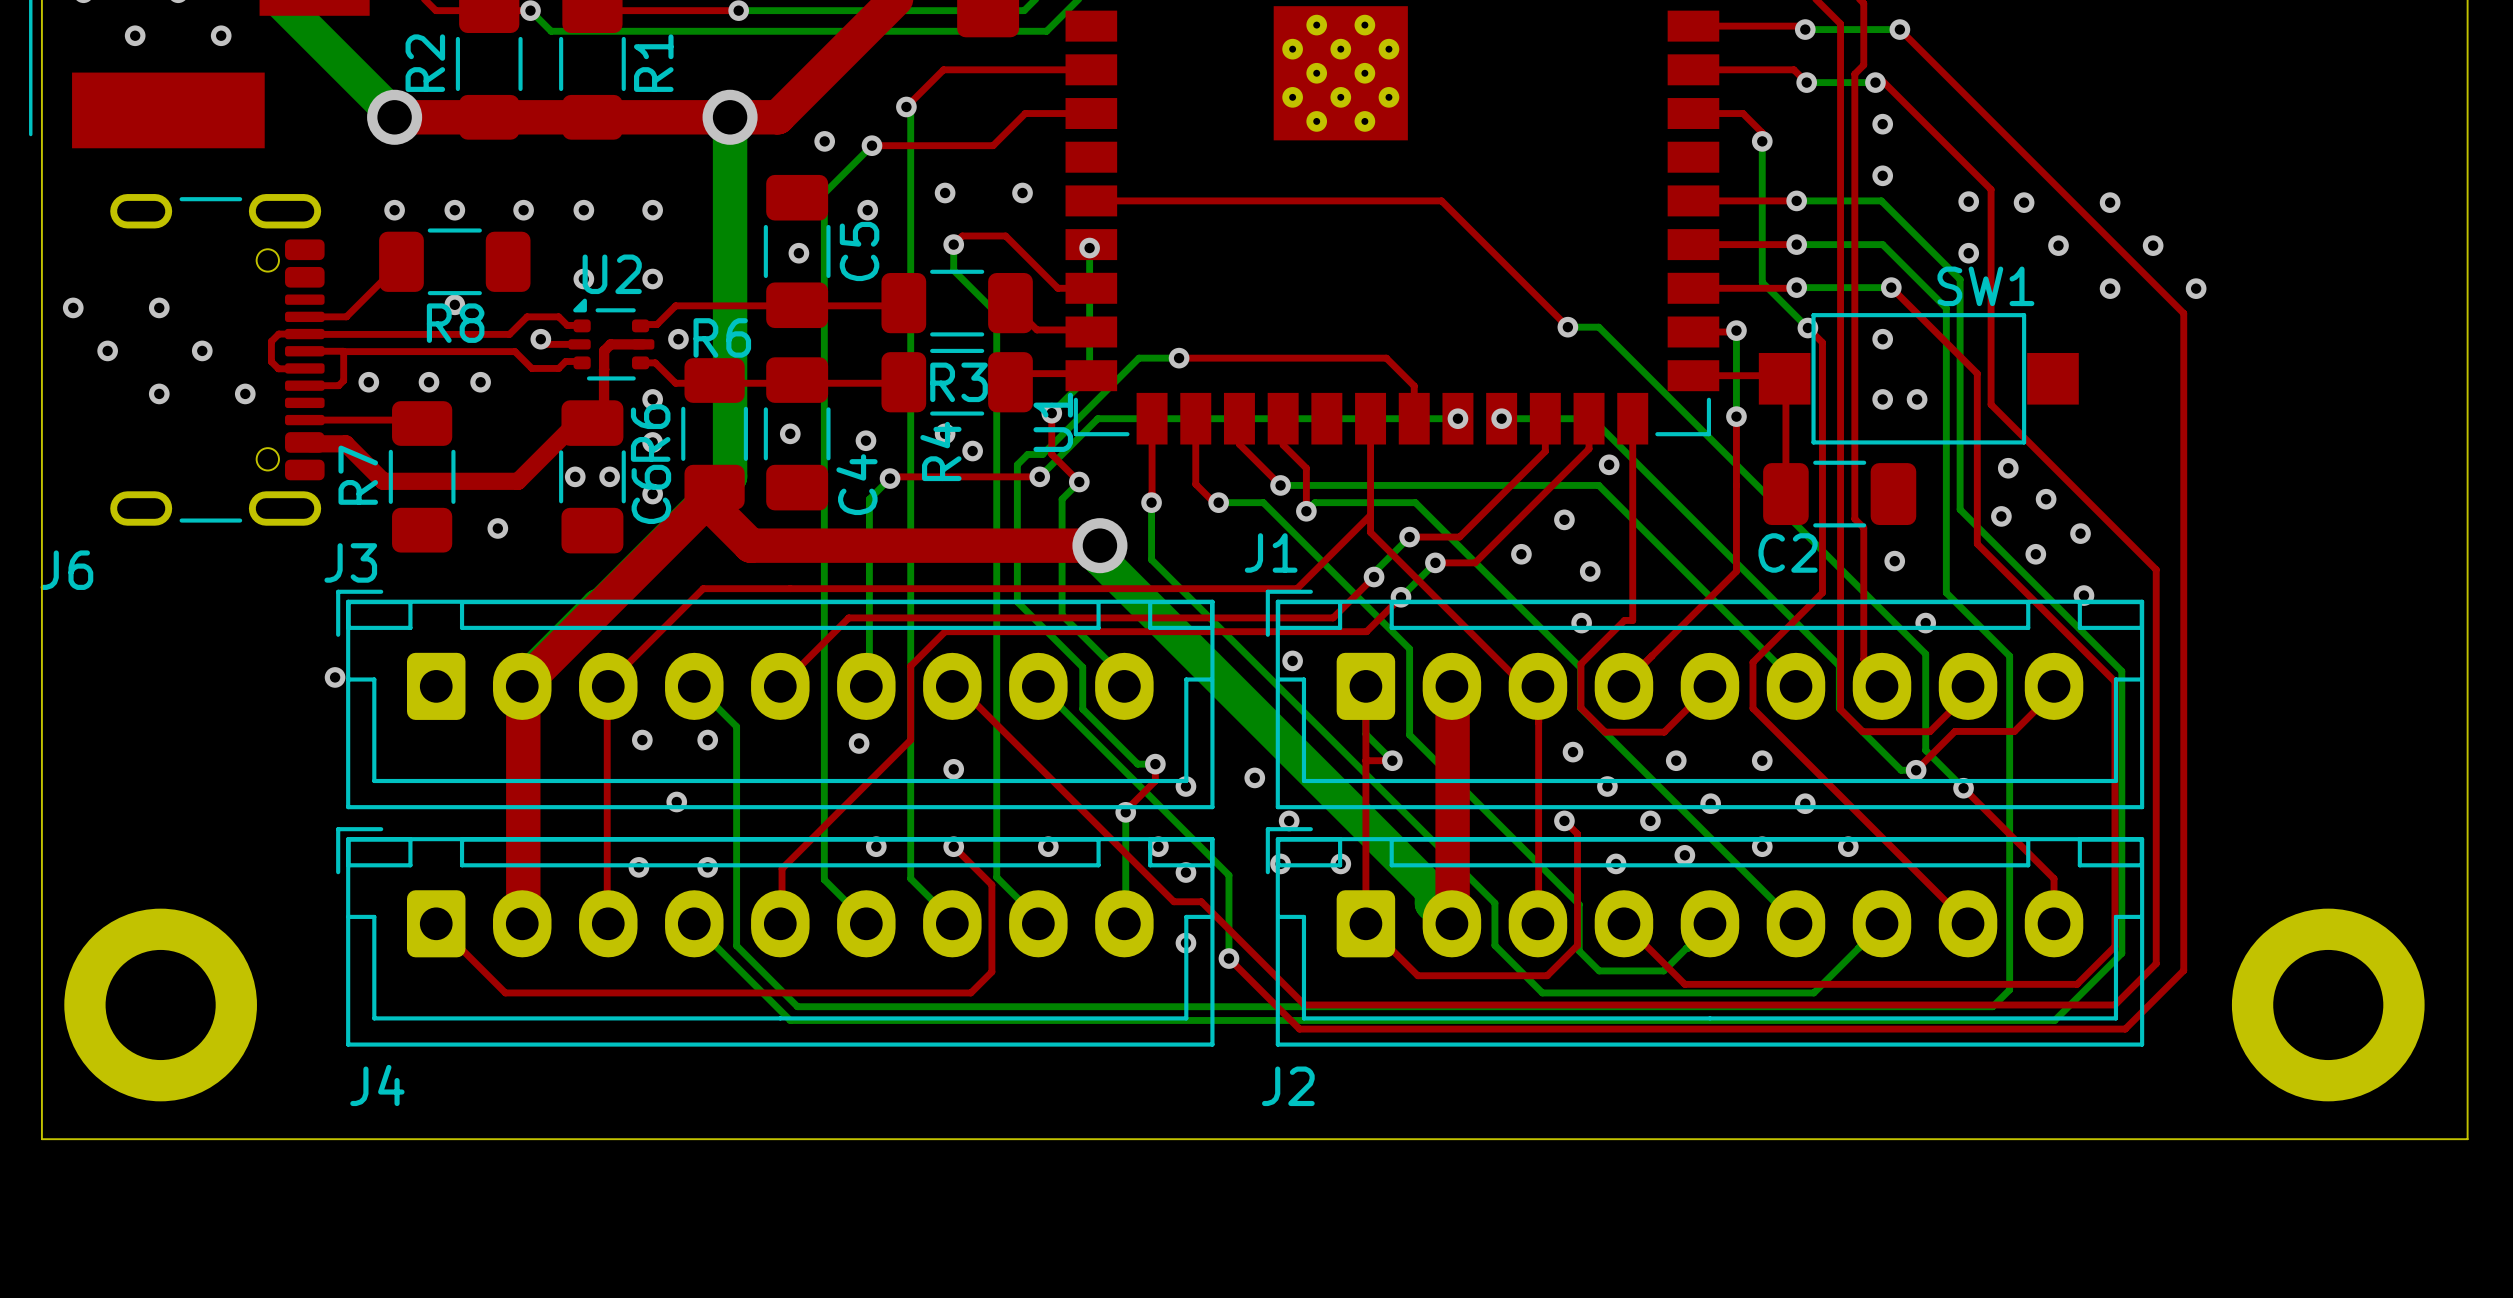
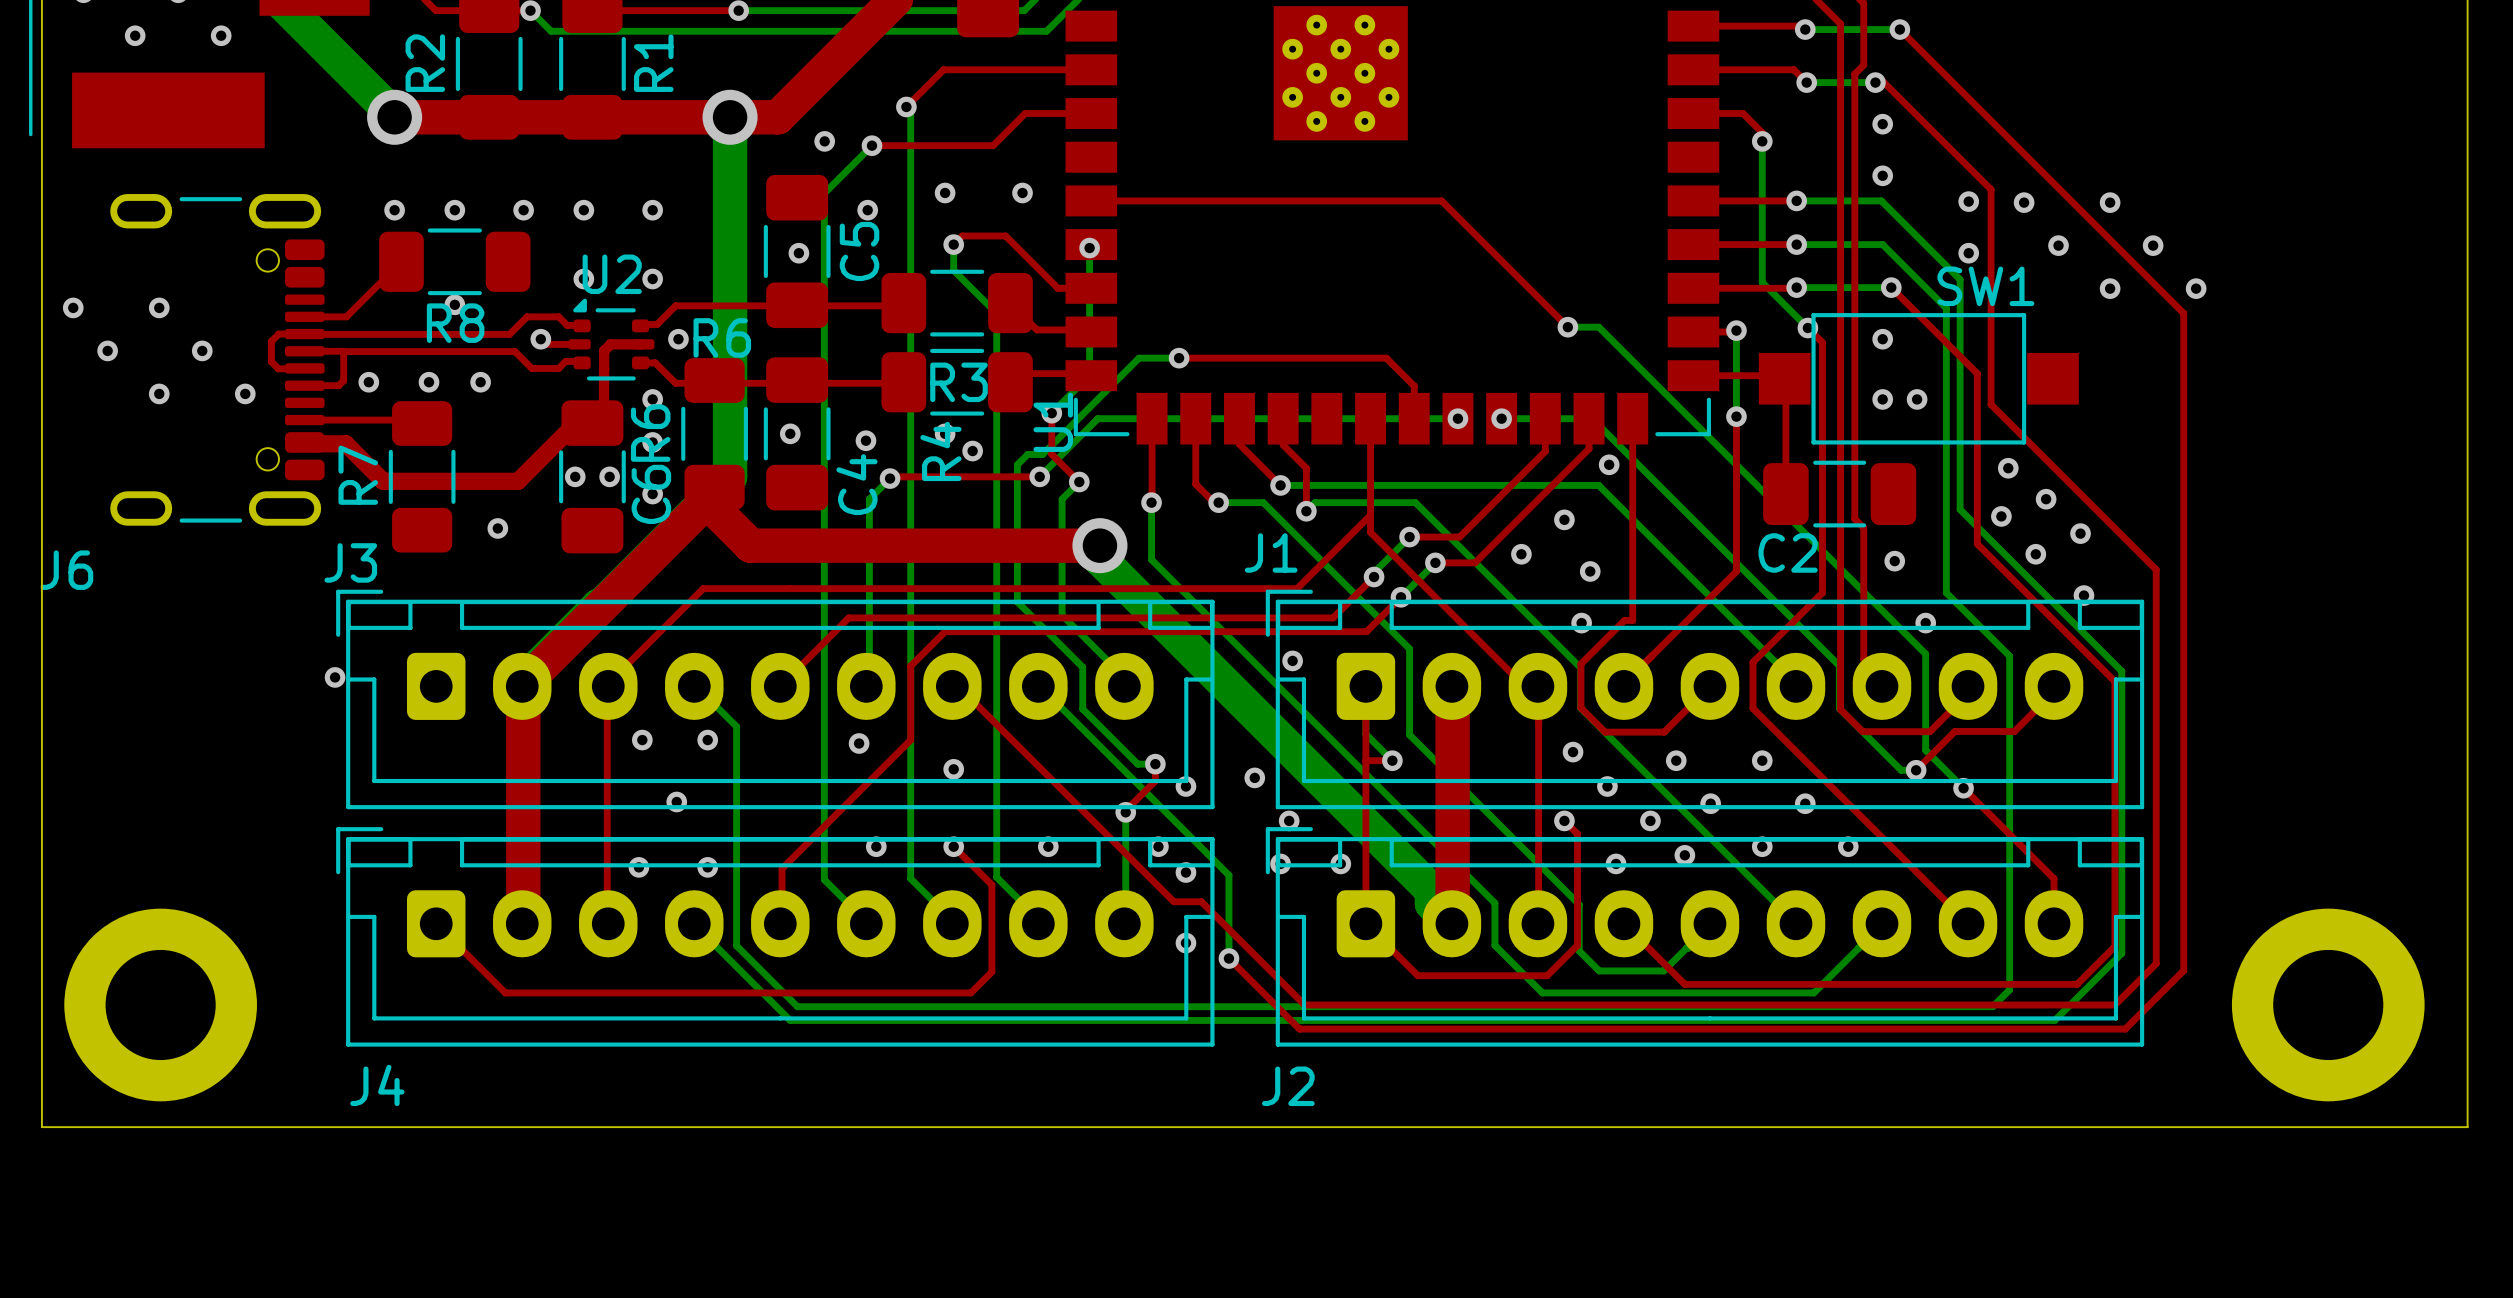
board edge: (41, 1127) (41, 1139) (2467, 1139) (2467, 1127) -> (41, 1127) (2467, 1127)

